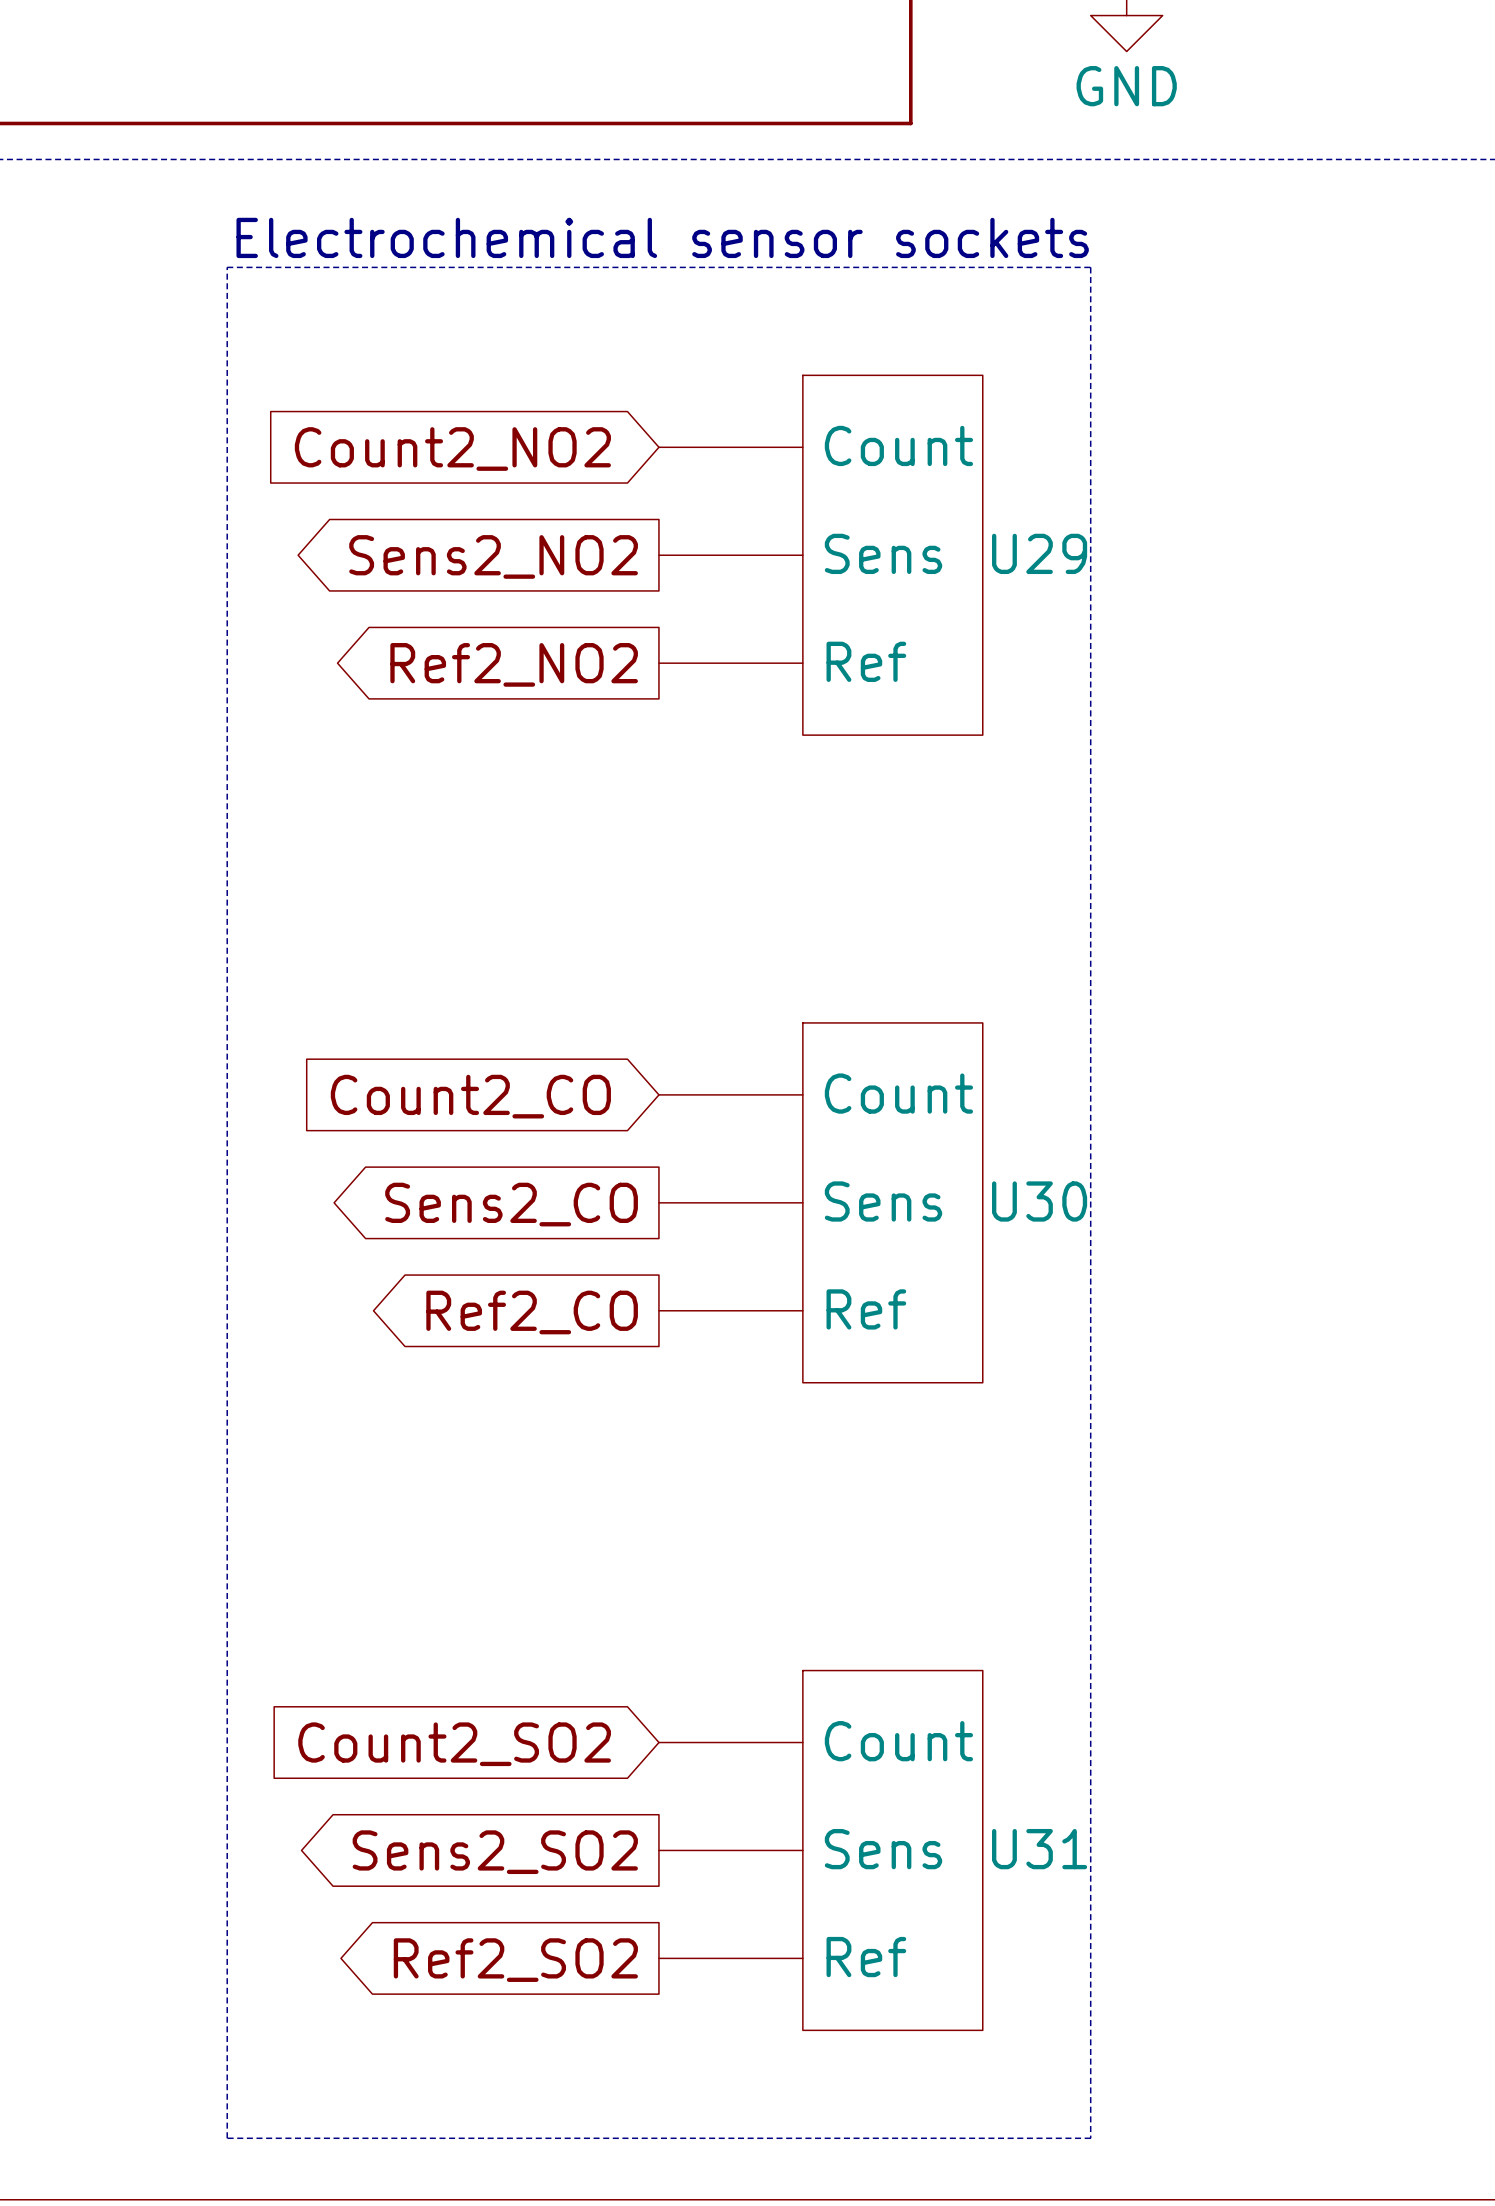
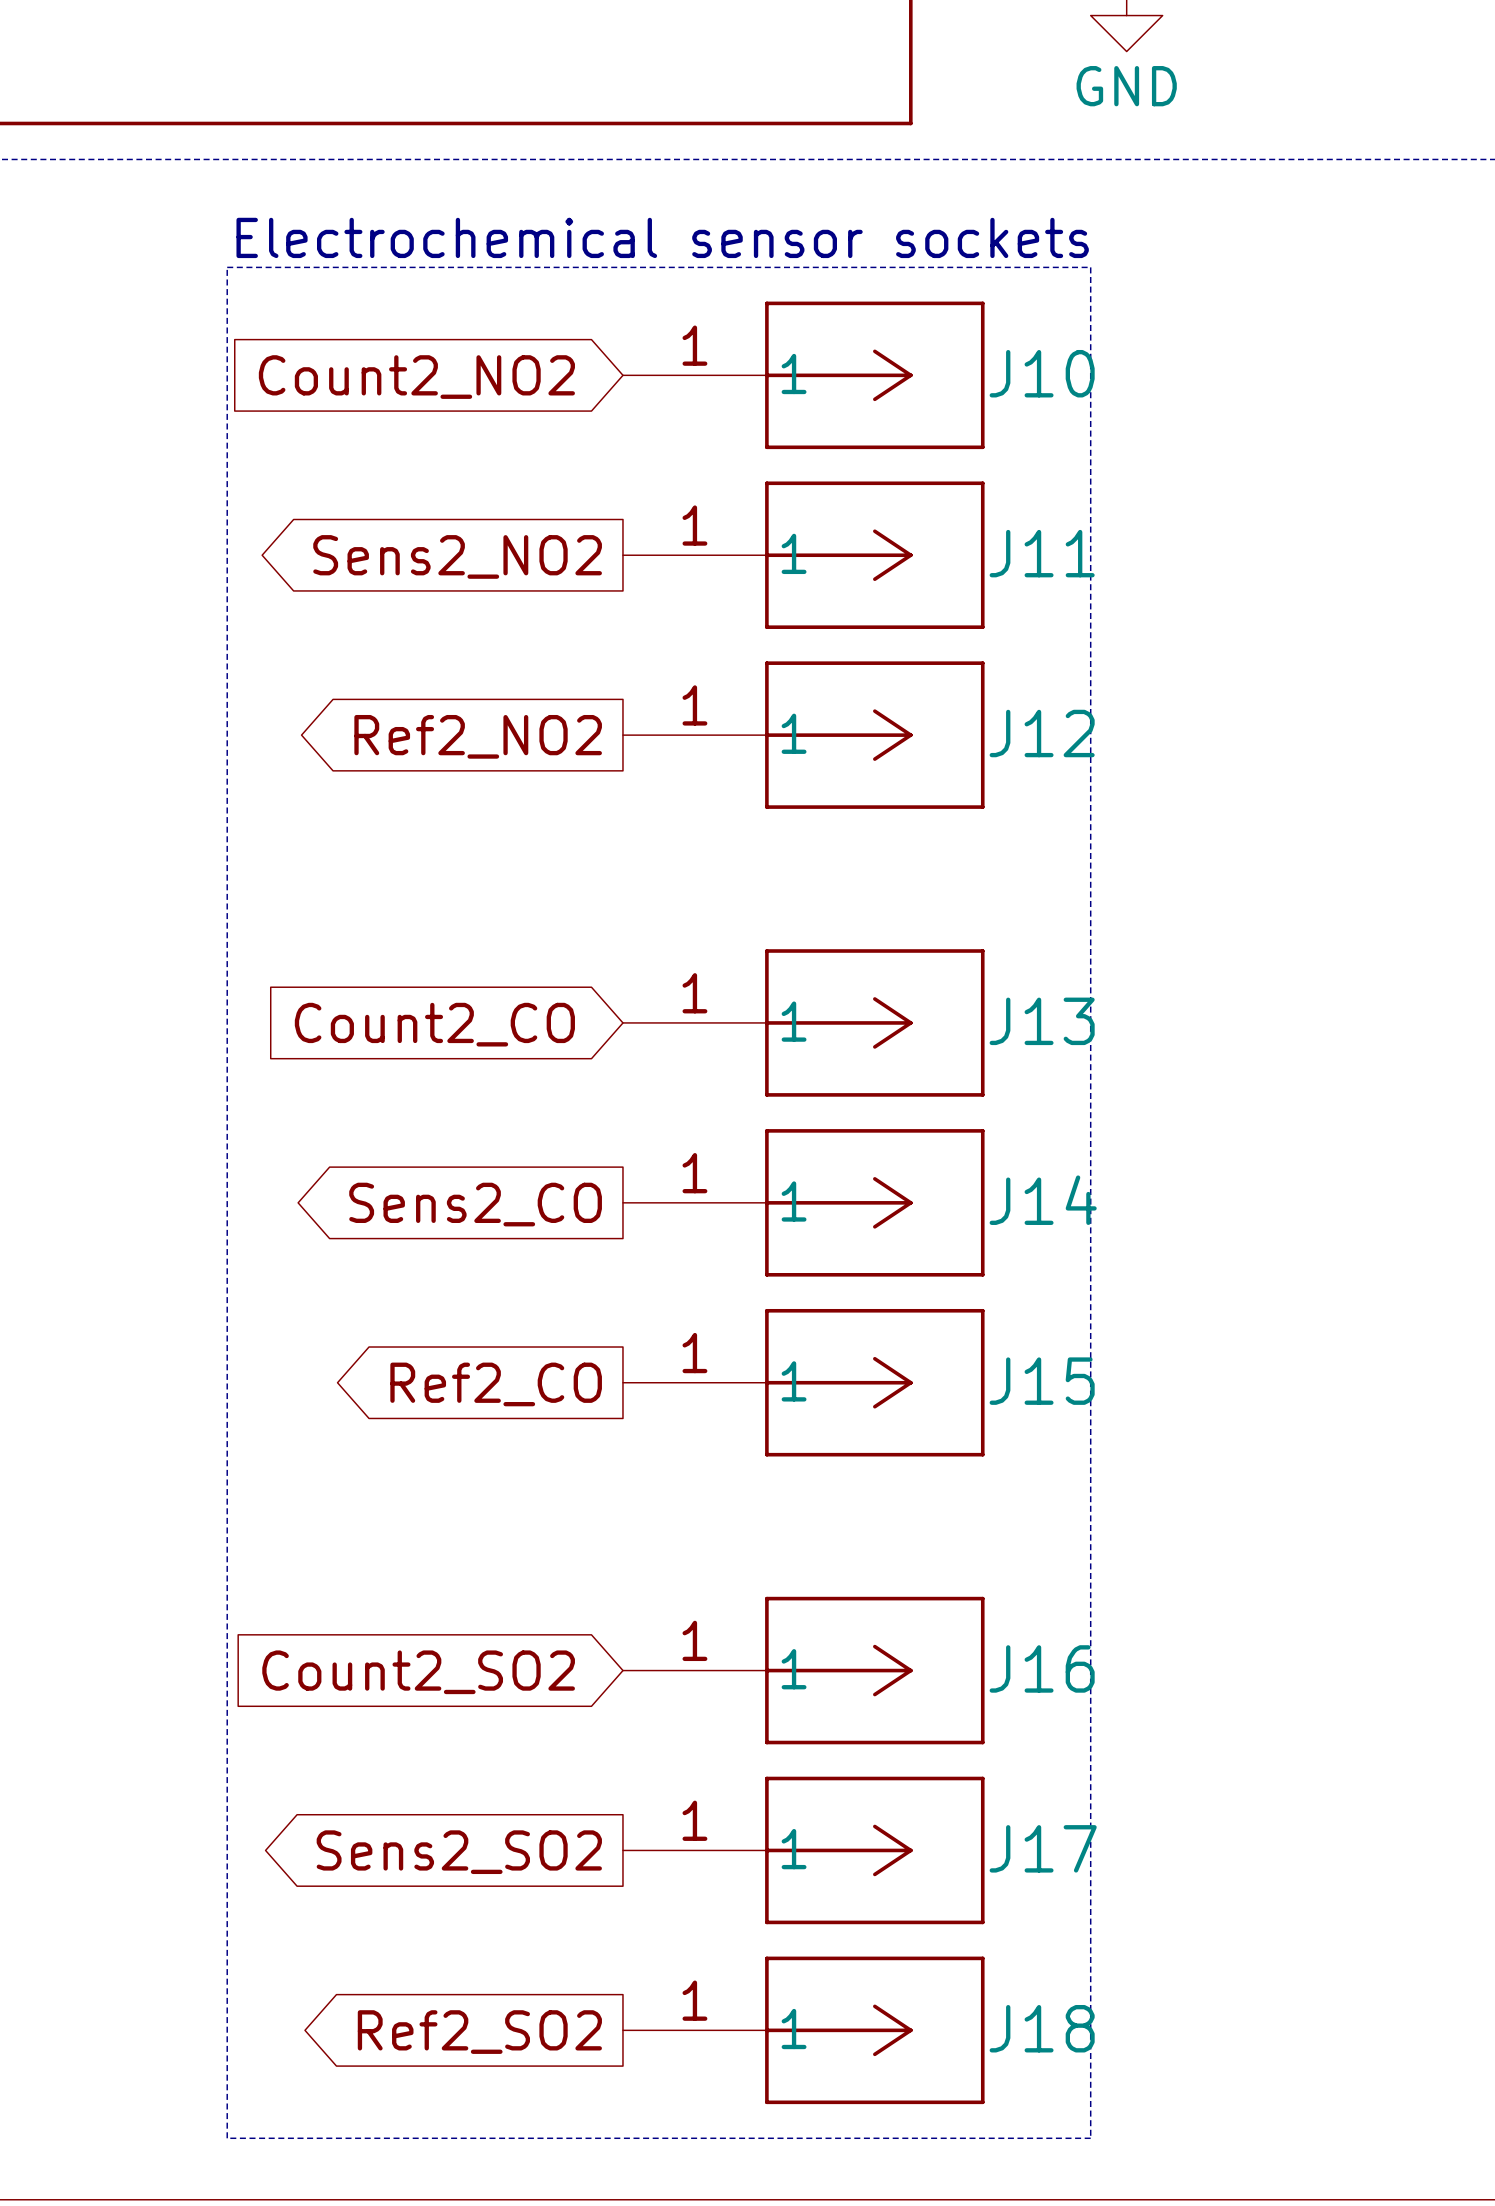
J10: none -> (803, 375)
global label position: Count2_NO2 (452, 449) -> Count2_NO2 (416, 377)
J11: none -> (803, 555)
U29: (820, 555) -> none
global label position: Sens2_NO2 (493, 556) -> Sens2_NO2 (457, 556)
global label position: Ref2_NO2 (514, 664) -> Ref2_NO2 (478, 736)
J12: none -> (803, 735)
J13: none -> (803, 1022)
global label position: Count2_CO (470, 1096) -> Count2_CO (434, 1024)
J14: none -> (803, 1202)
U30: (820, 1202) -> none
global label position: Sens2_CO (511, 1204) -> Sens2_CO (475, 1204)
global label position: Ref2_CO (532, 1312) -> Ref2_CO (496, 1384)
J15: none -> (803, 1382)
J16: none -> (803, 1670)
global label position: Count2_SO2 (454, 1744) -> Count2_SO2 (418, 1672)
J17: none -> (803, 1850)
U31: (820, 1850) -> none
global label position: Sens2_SO2 (495, 1852) -> Sens2_SO2 (459, 1852)
global label position: Ref2_SO2 (515, 1960) -> Ref2_SO2 (479, 2032)
J18: none -> (803, 2030)

